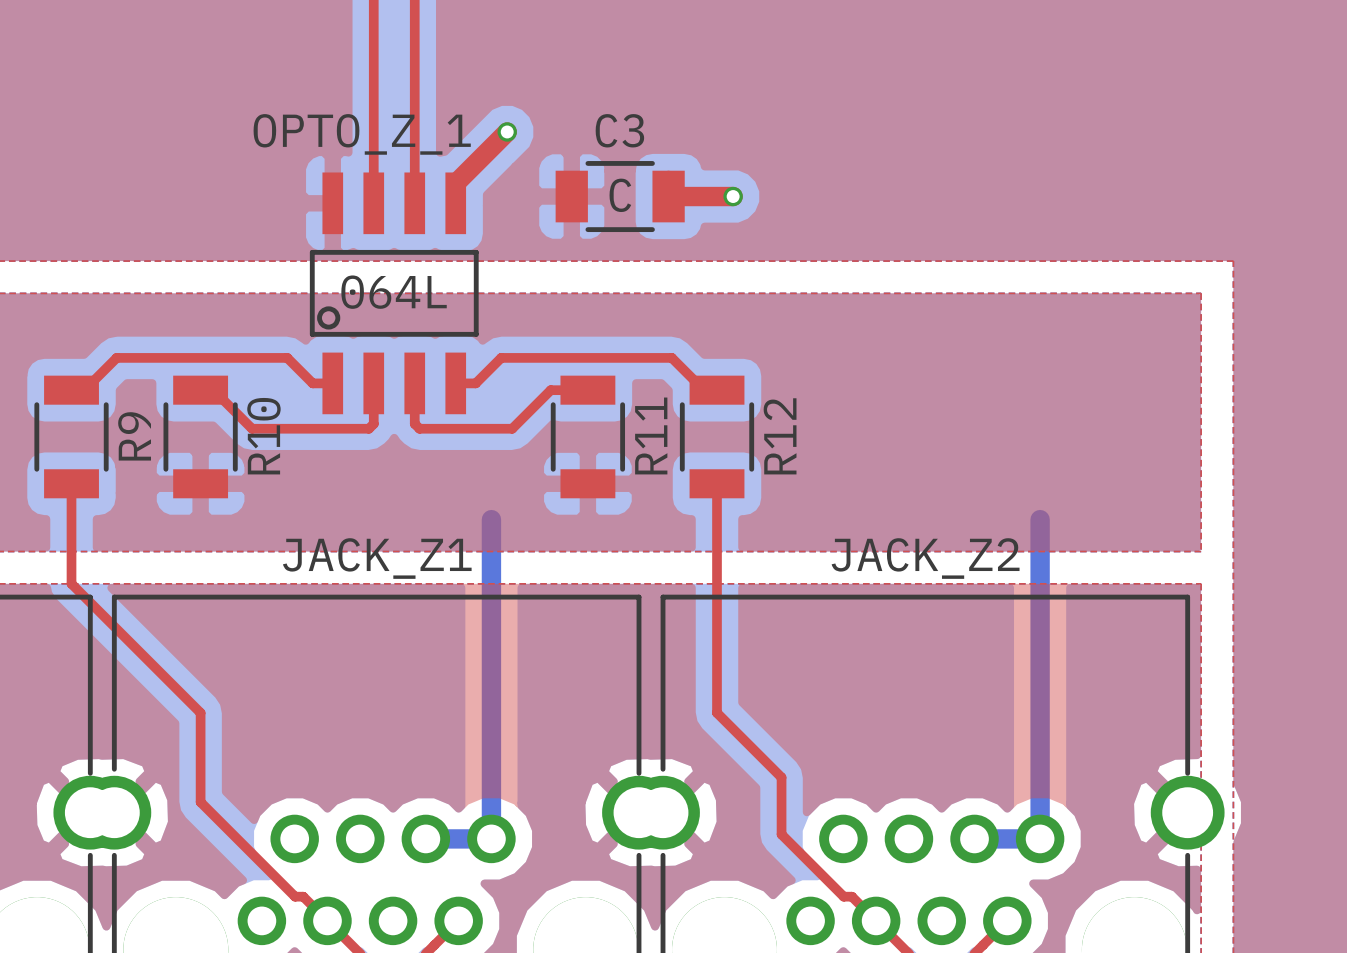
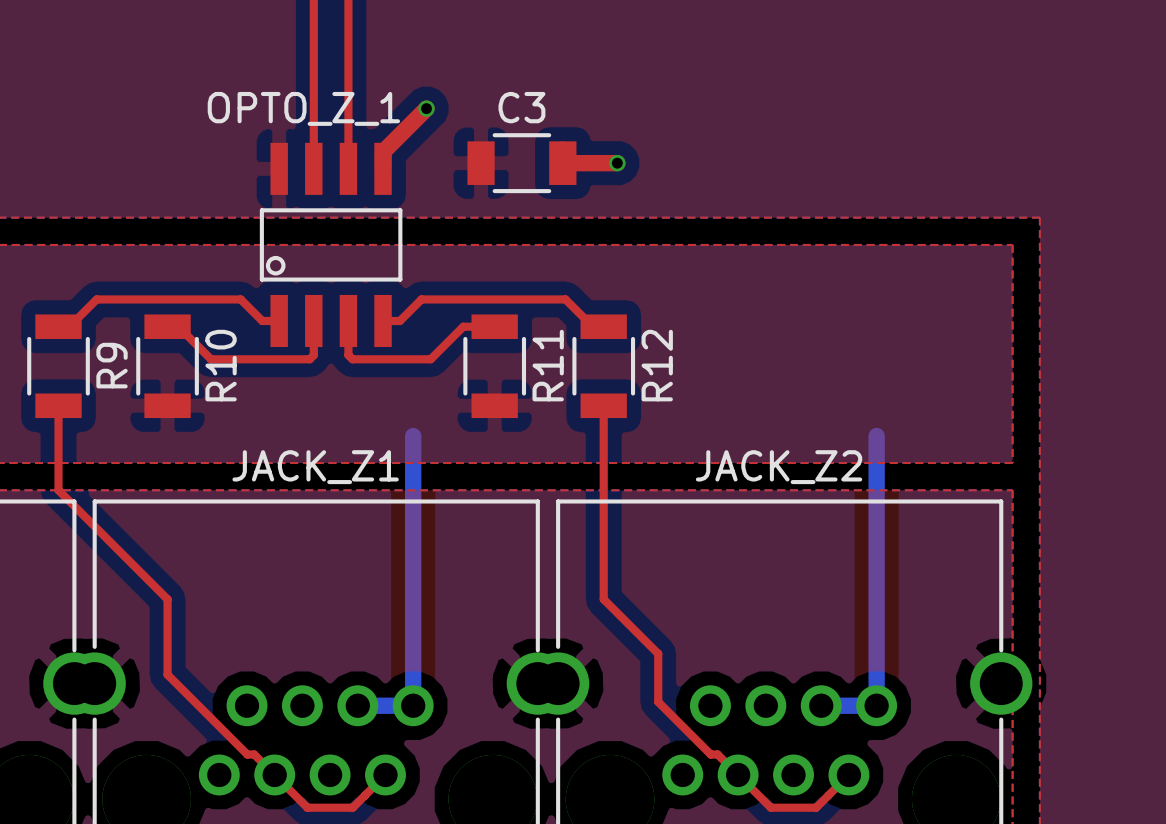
C3 value: C (620, 195) -> none
OPTO_Z_1 value: 064L (394, 292) -> none

